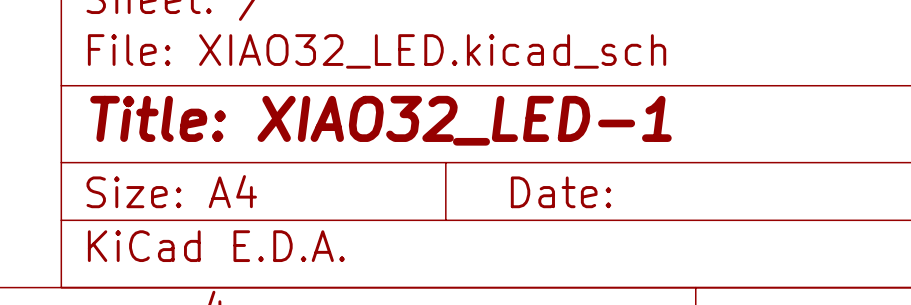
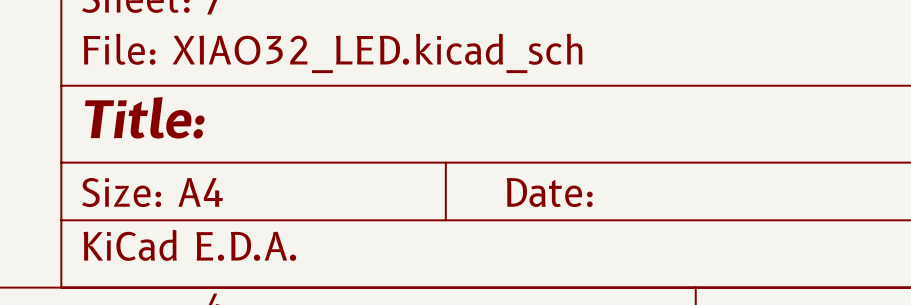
title block: Title: XIAO32_LED-1 (380, 120) -> Title: (144, 117)

